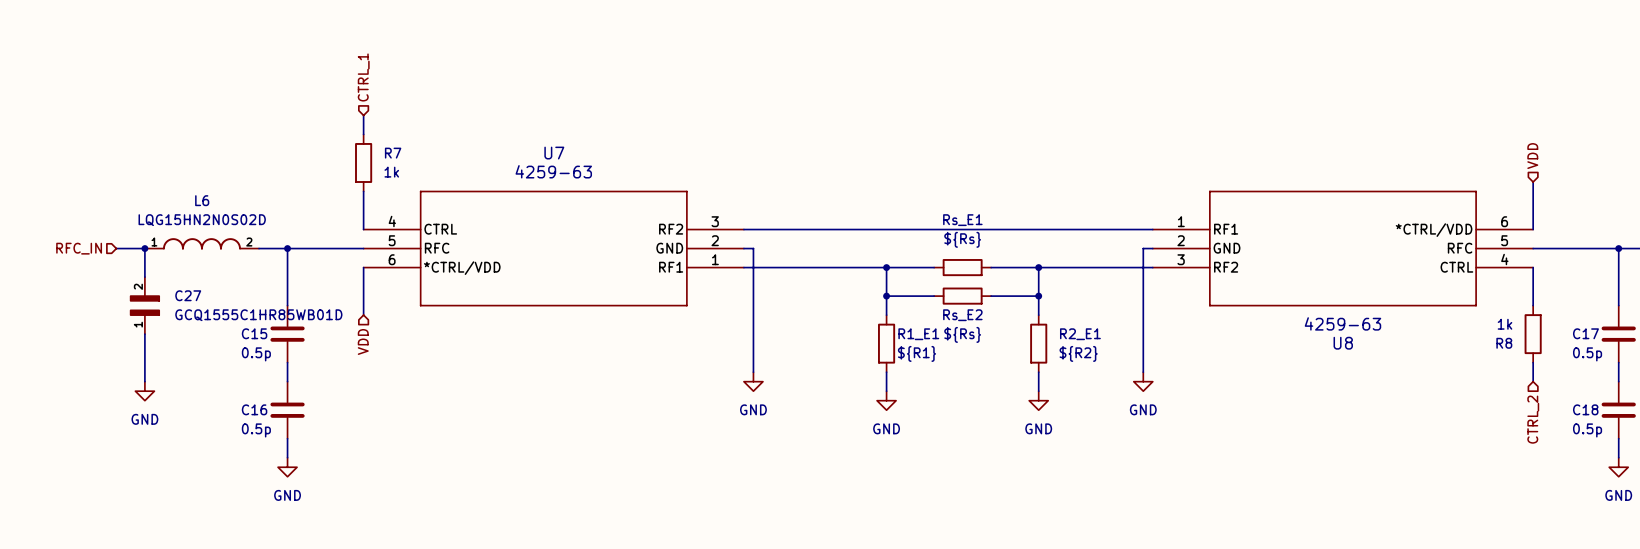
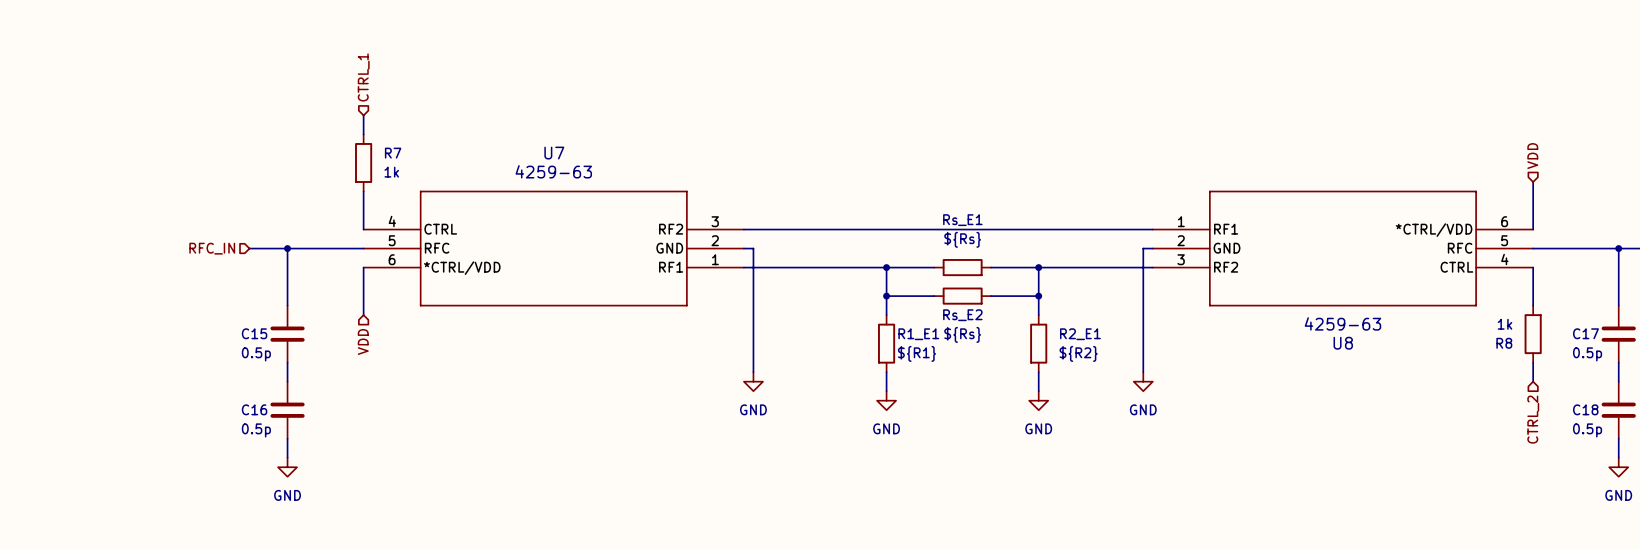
L6: LQG15HN2N0S02D (201, 243) -> none
hierarchical label position: RFC_IN (79, 248) -> RFC_IN (212, 248)
wire: (116, 248) (144, 248) (144, 277) -> none
junction: (144, 248) -> none
C27: GCQ1555C1HR85WB01D (144, 305) -> none
wire: (144, 334) (144, 381) -> none
power symbol: GND (144, 391) -> none

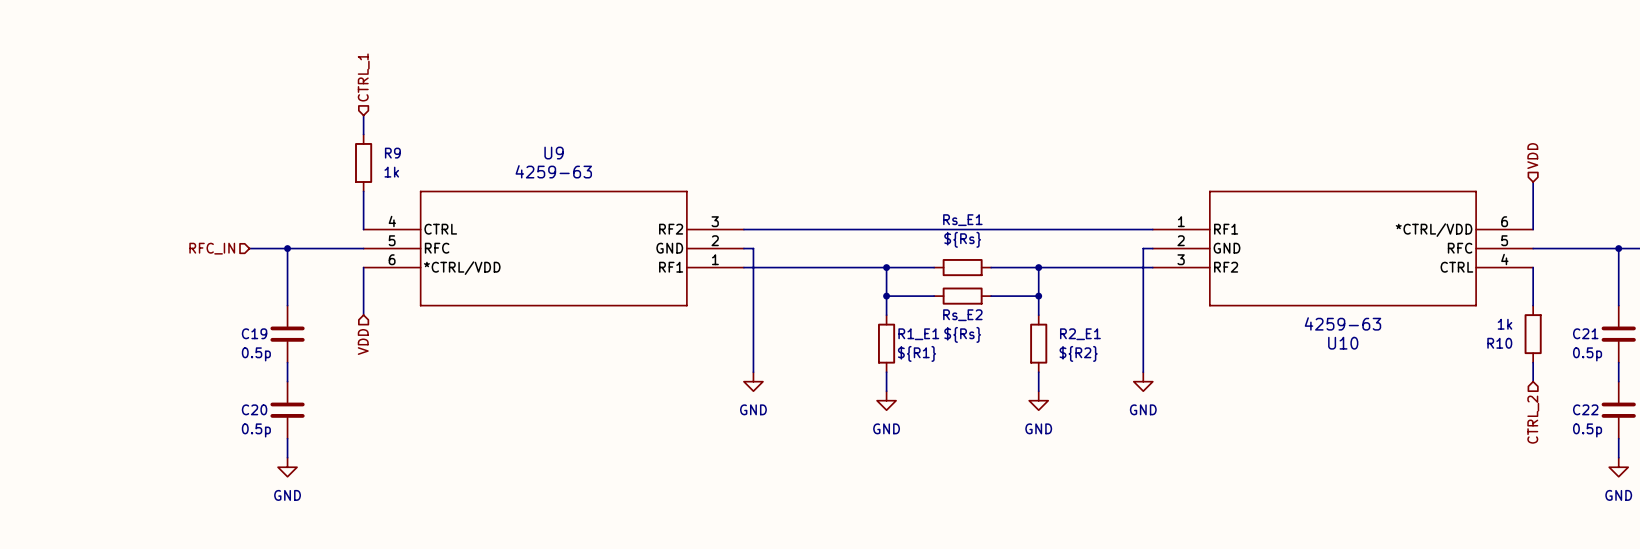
R7 name: R7 (393, 153) -> R9 (392, 153)
U7 name: U7 (554, 153) -> U9 (554, 153)
C15 name: C15 (254, 333) -> C19 (254, 333)
C17 name: C17 (1585, 333) -> C21 (1585, 333)
U8 name: U8 (1343, 343) -> U10 (1343, 343)
R8 name: R8 (1504, 343) -> R10 (1499, 343)
C16 name: C16 (254, 409) -> C20 (254, 409)
C18 name: C18 (1585, 409) -> C22 (1585, 409)

